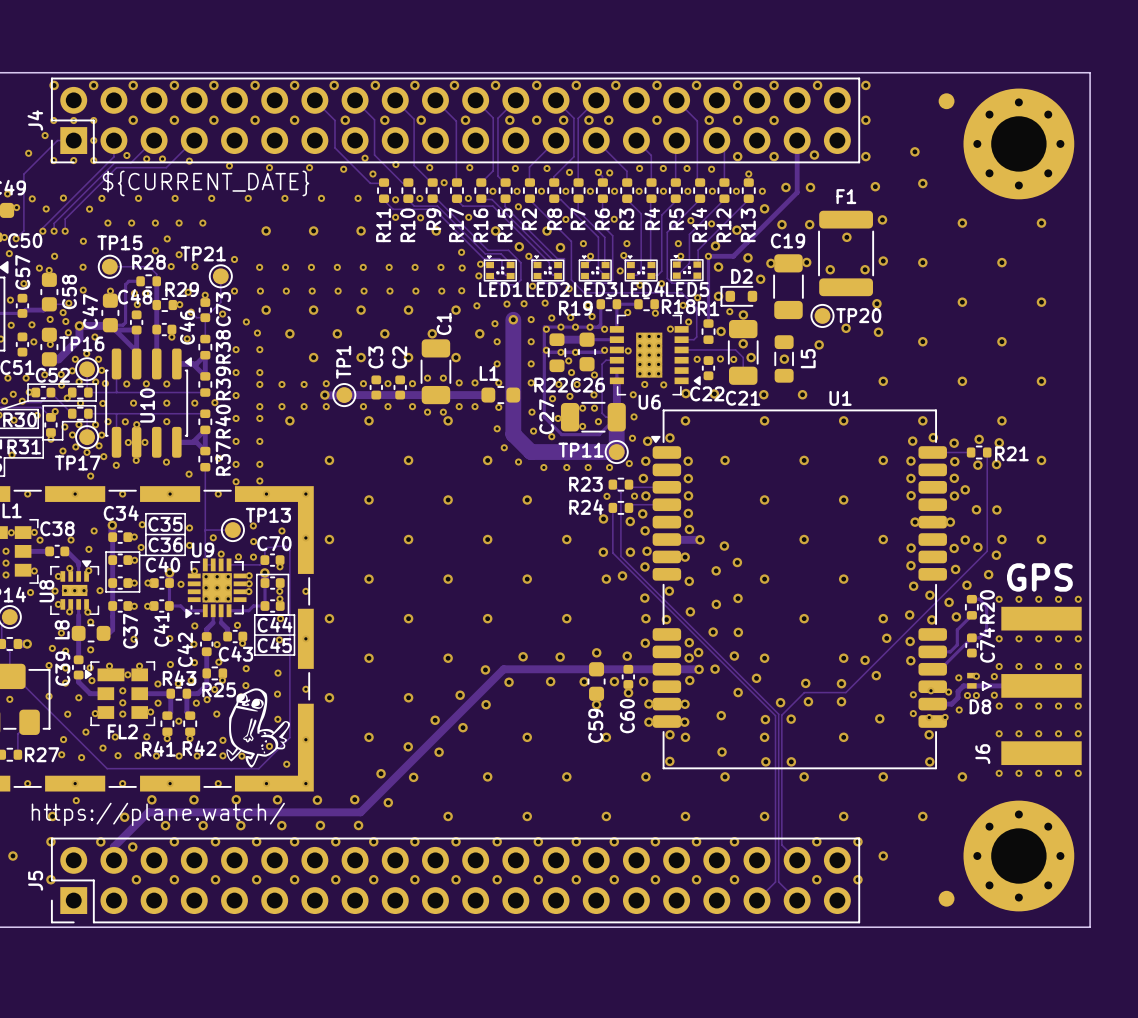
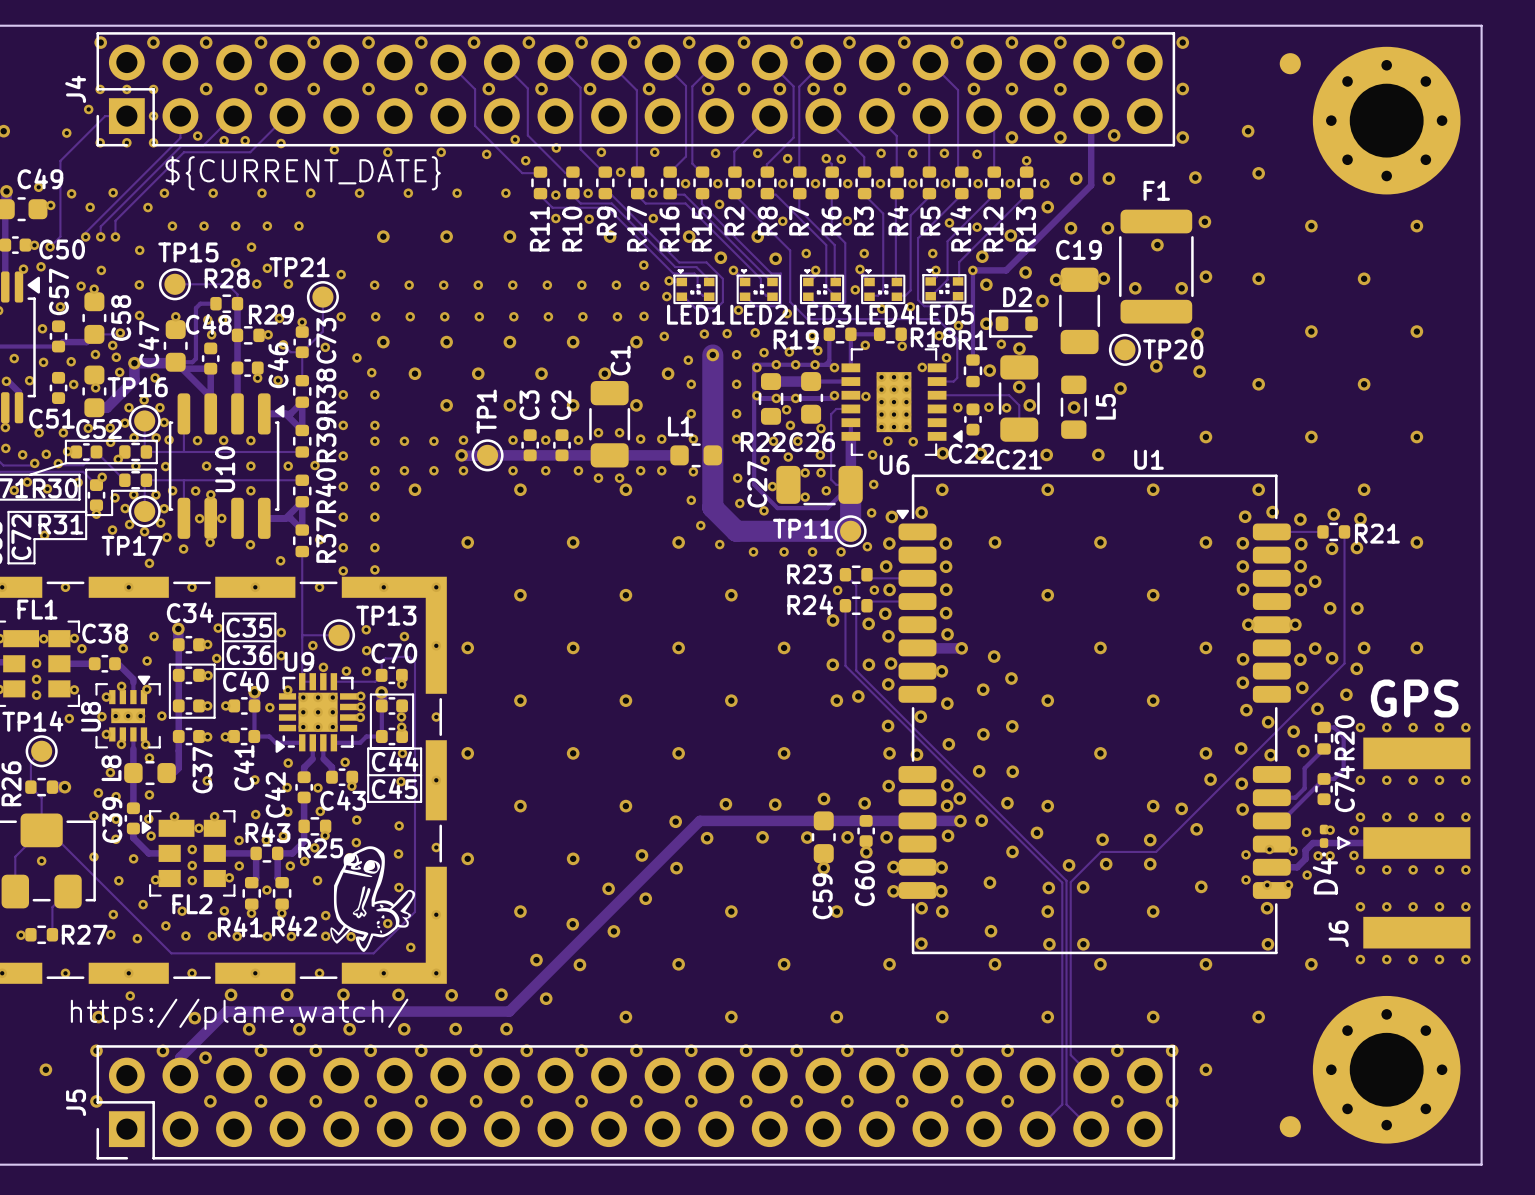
D8: (971, 680) -> none
D4: none -> (1324, 840)

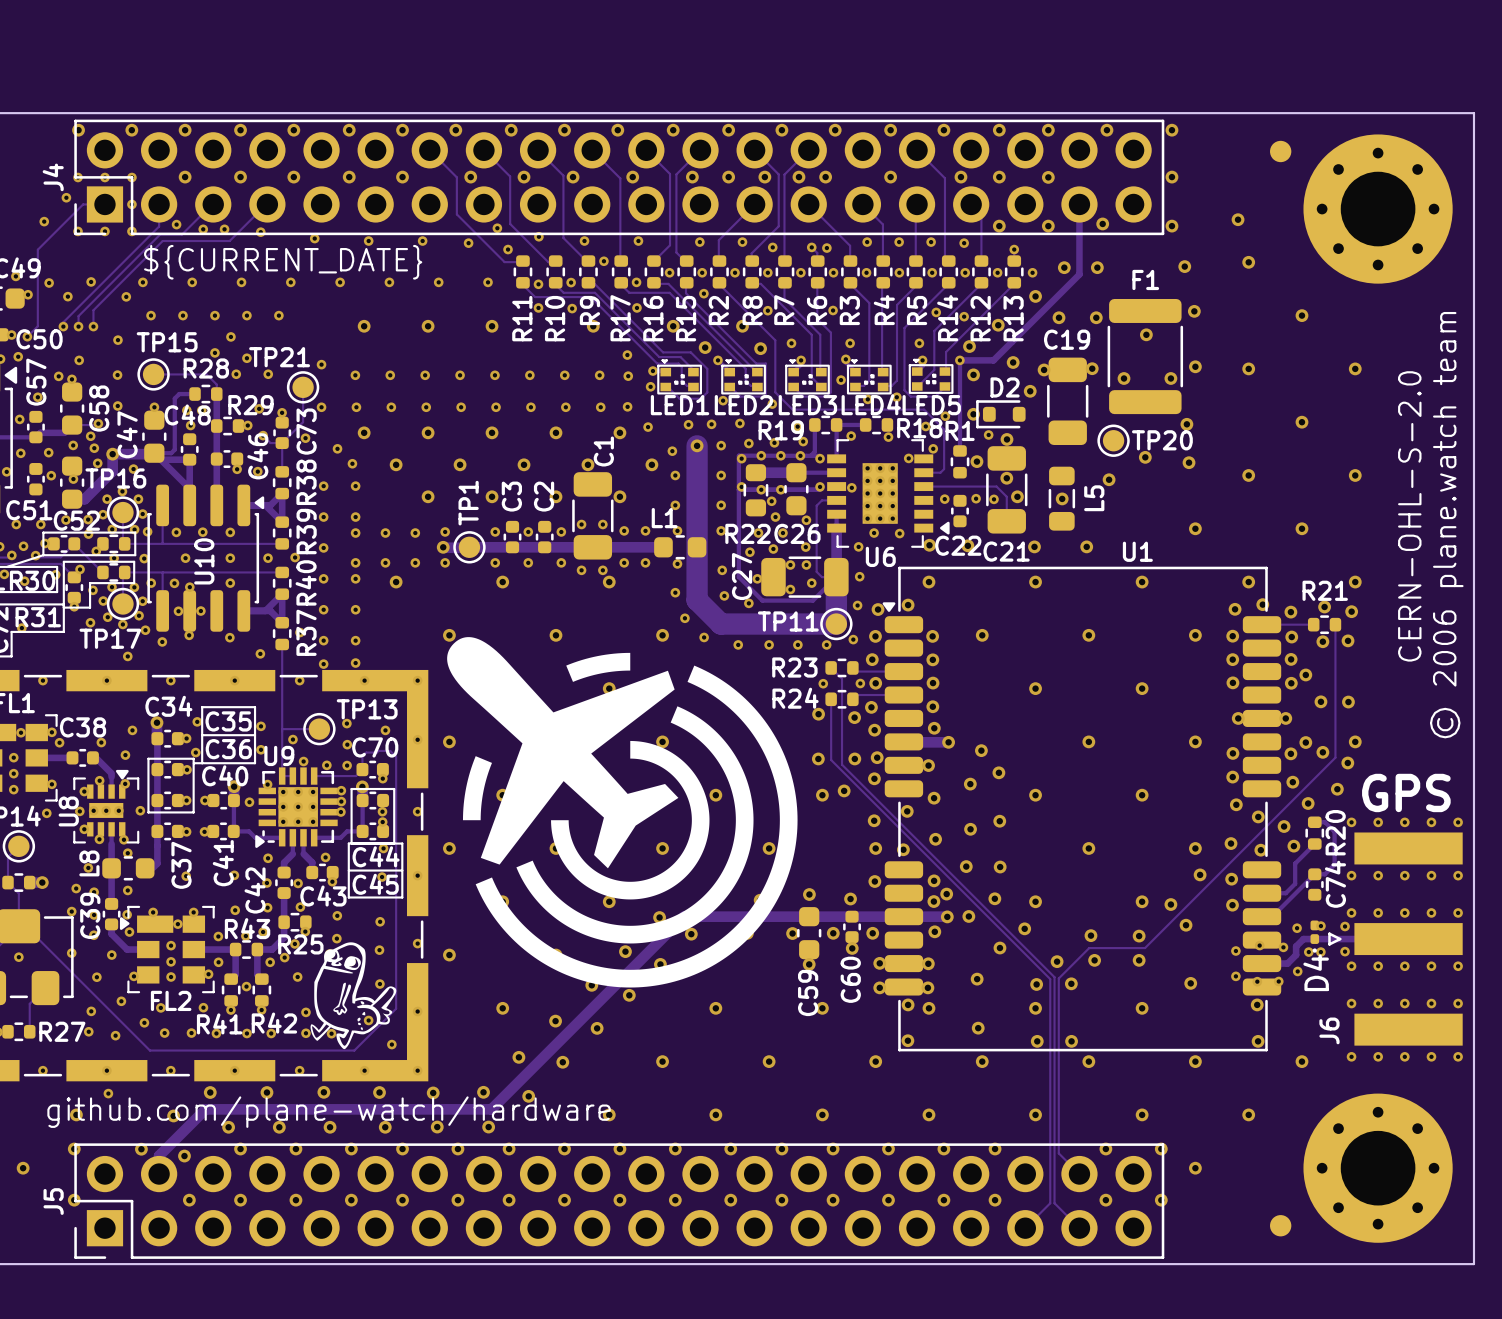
via: (1416, 226) -> none
via: (1416, 331) -> none
text: none -> CERN-OHL-S-2.0 (1409, 516)
text: none -> © 2006 plane.watch team (1446, 525)
via: (1416, 437) -> none
R21 name position: R21 (1377, 533) -> R21 (1325, 590)
via: (1416, 542) -> none
drawing: none -> [447, 637, 798, 988]
via: (1416, 647) -> none
text: https://plane.watch/ (239, 1014) -> github.com/plane-watch/hardware (329, 1112)

